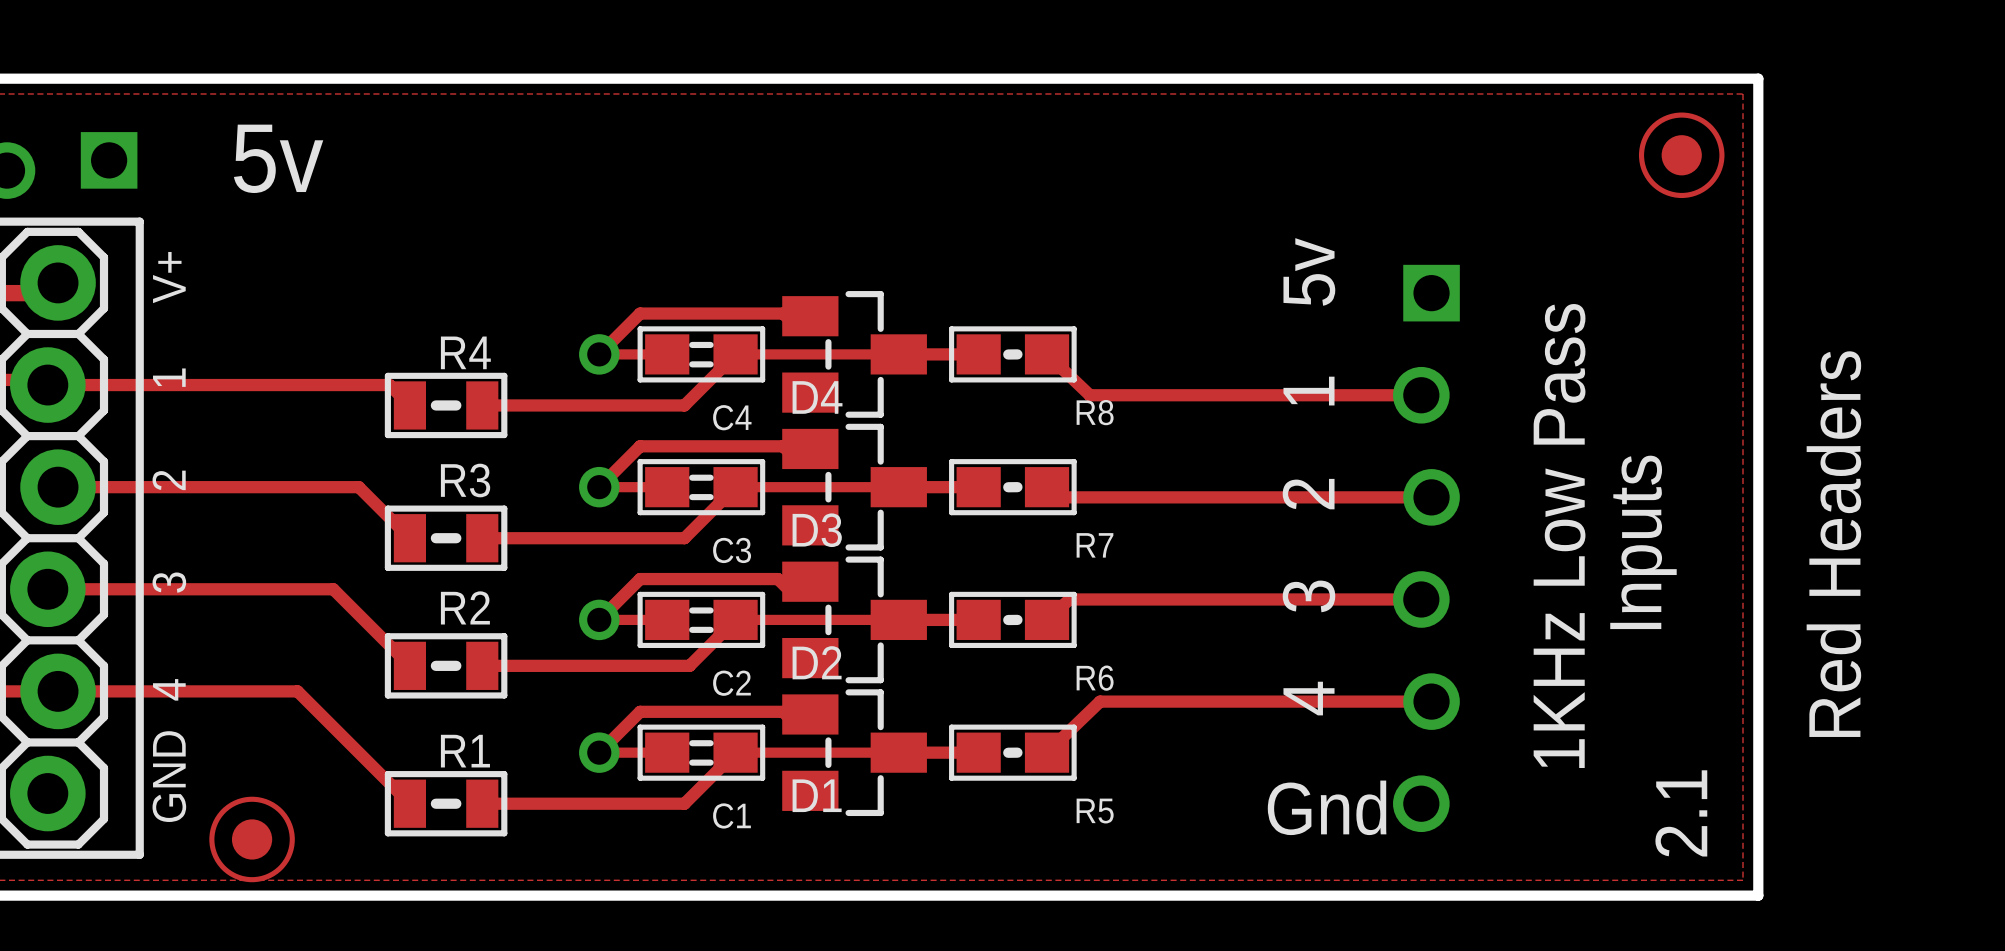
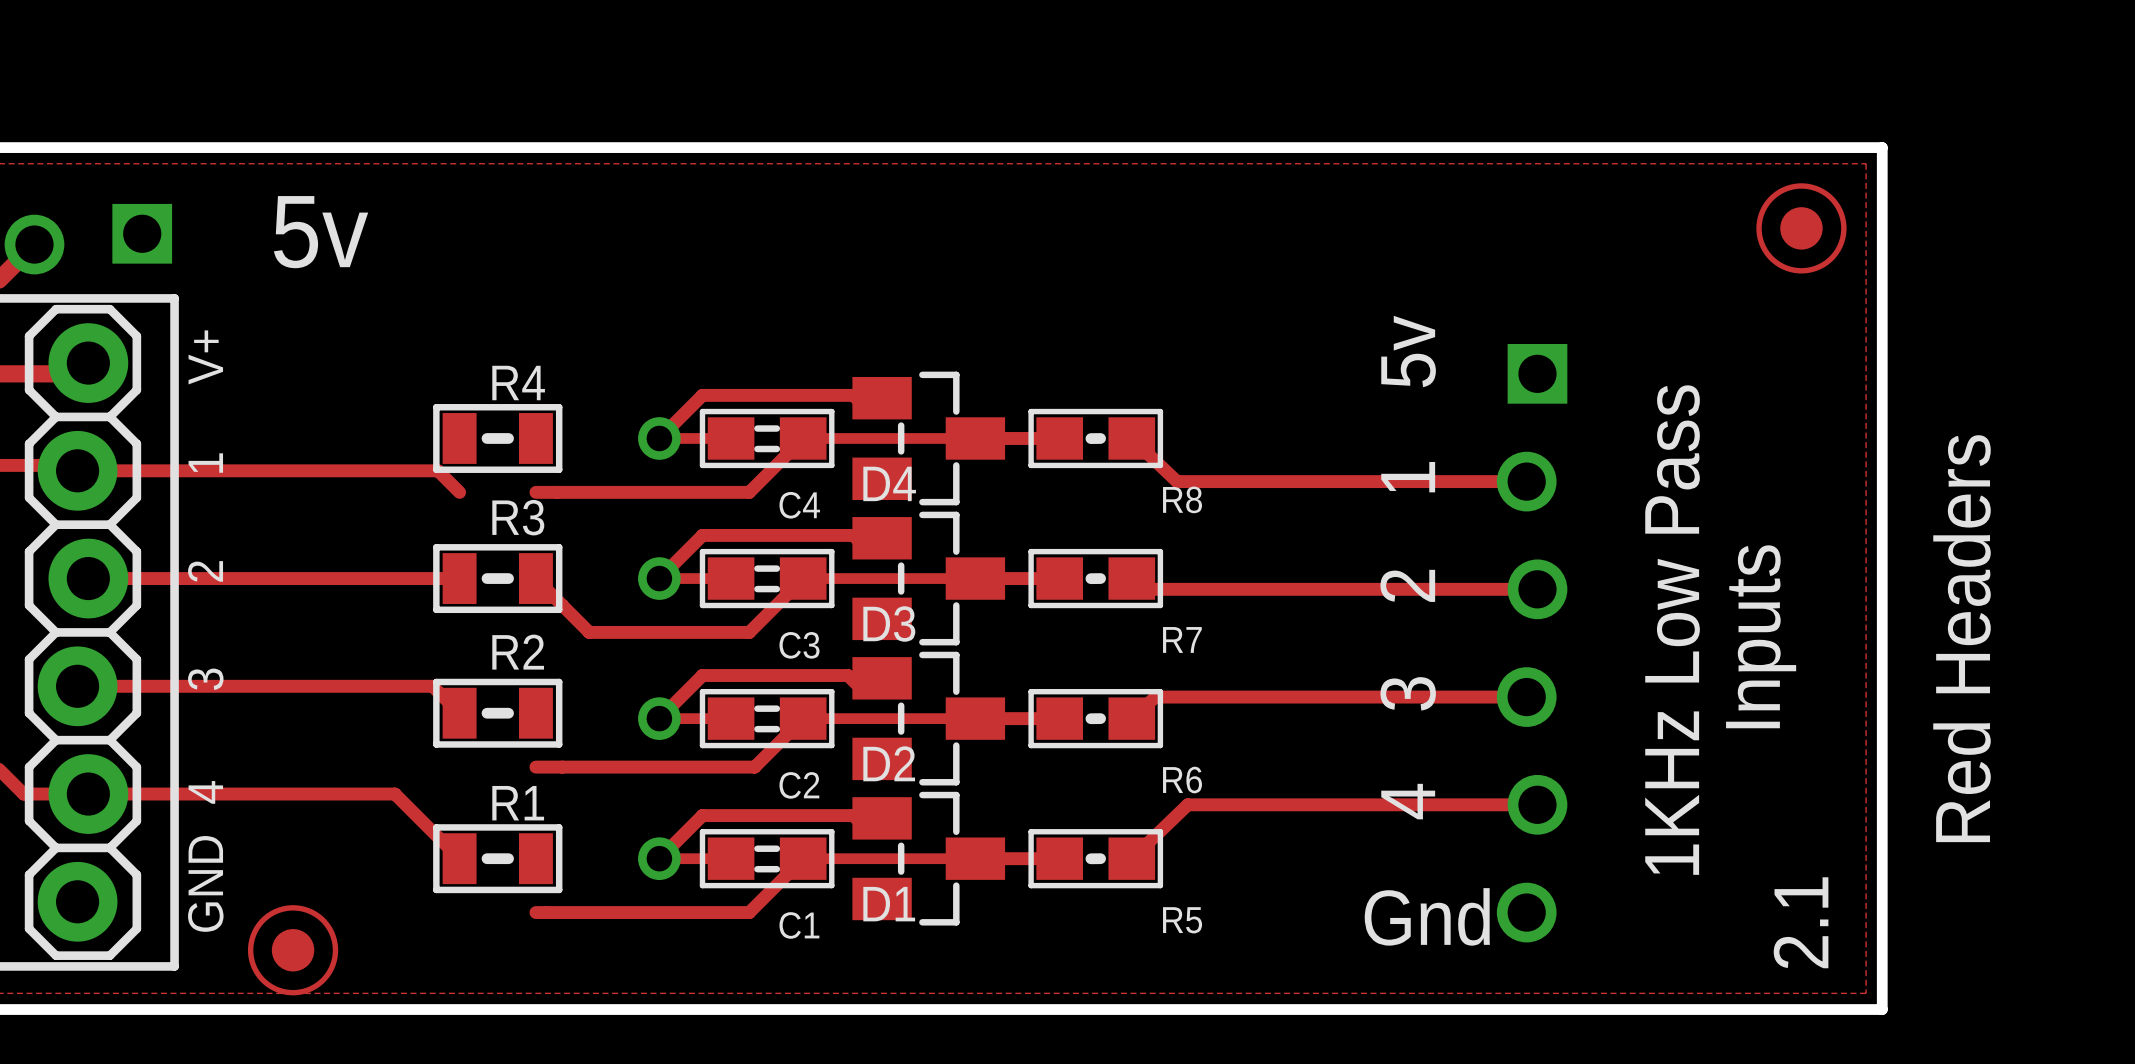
R4 position: (446, 405) -> (497, 438)
track: (358, 487) (409, 538) -> (405, 578) (459, 578)
R3 position: (446, 538) -> (497, 578)
track: (482, 538) (532, 538) -> (535, 578) (589, 632)
track: (333, 589) (409, 665) -> (378, 686) (432, 686) (459, 713)
R2 position: (446, 665) -> (497, 713)
track: (297, 691) (409, 803) -> (341, 794) (394, 794) (459, 858)
R1 position: (446, 803) -> (497, 858)

